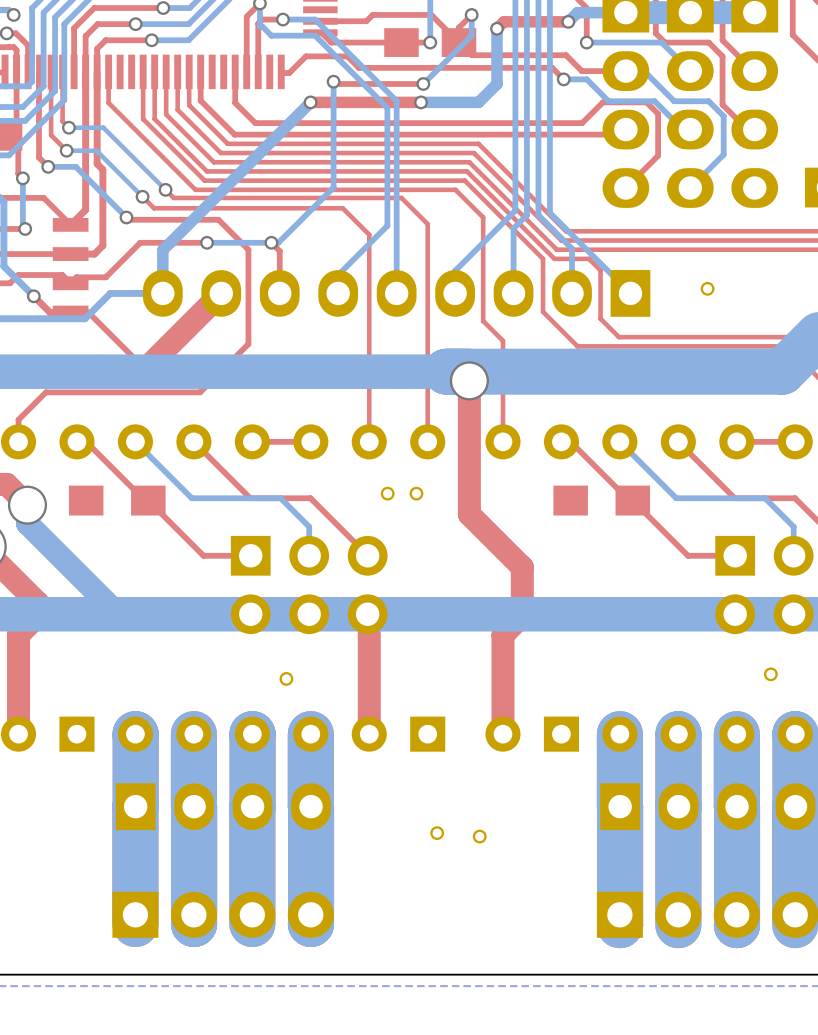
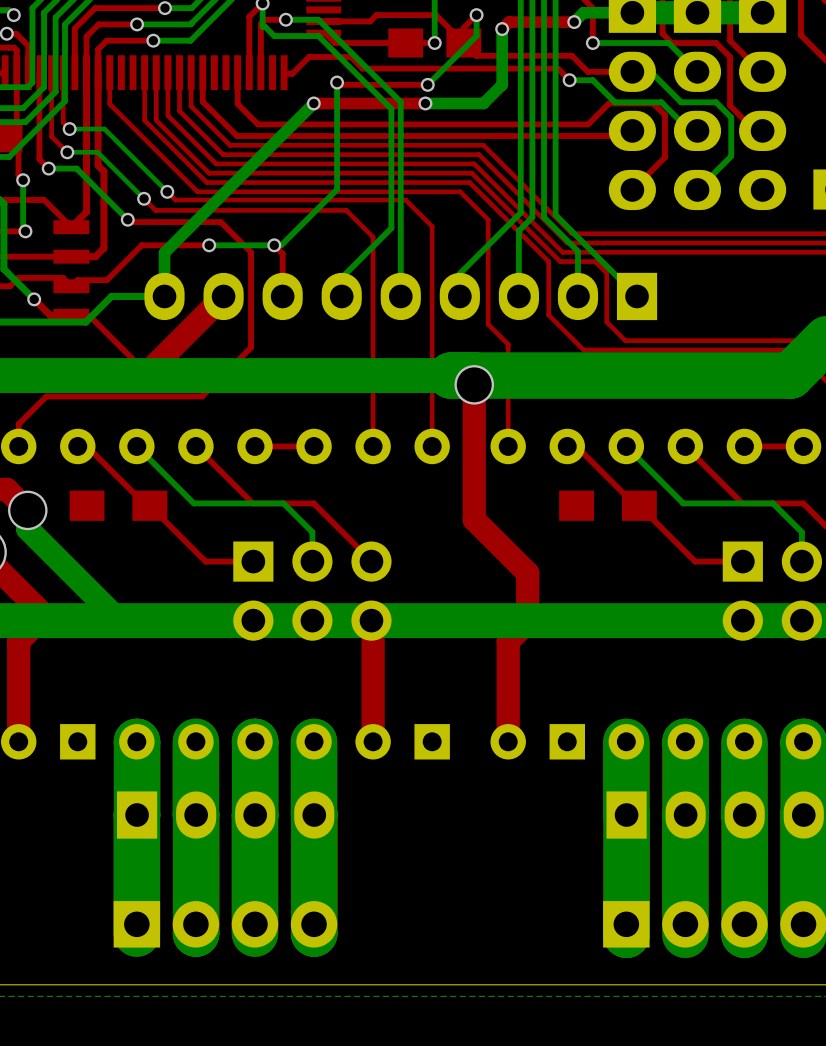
part: (707, 288) -> none
part: (387, 493) -> none
part: (416, 493) -> none
part: (770, 674) -> none
part: (286, 678) -> none
part: (437, 833) -> none
part: (479, 836) -> none

